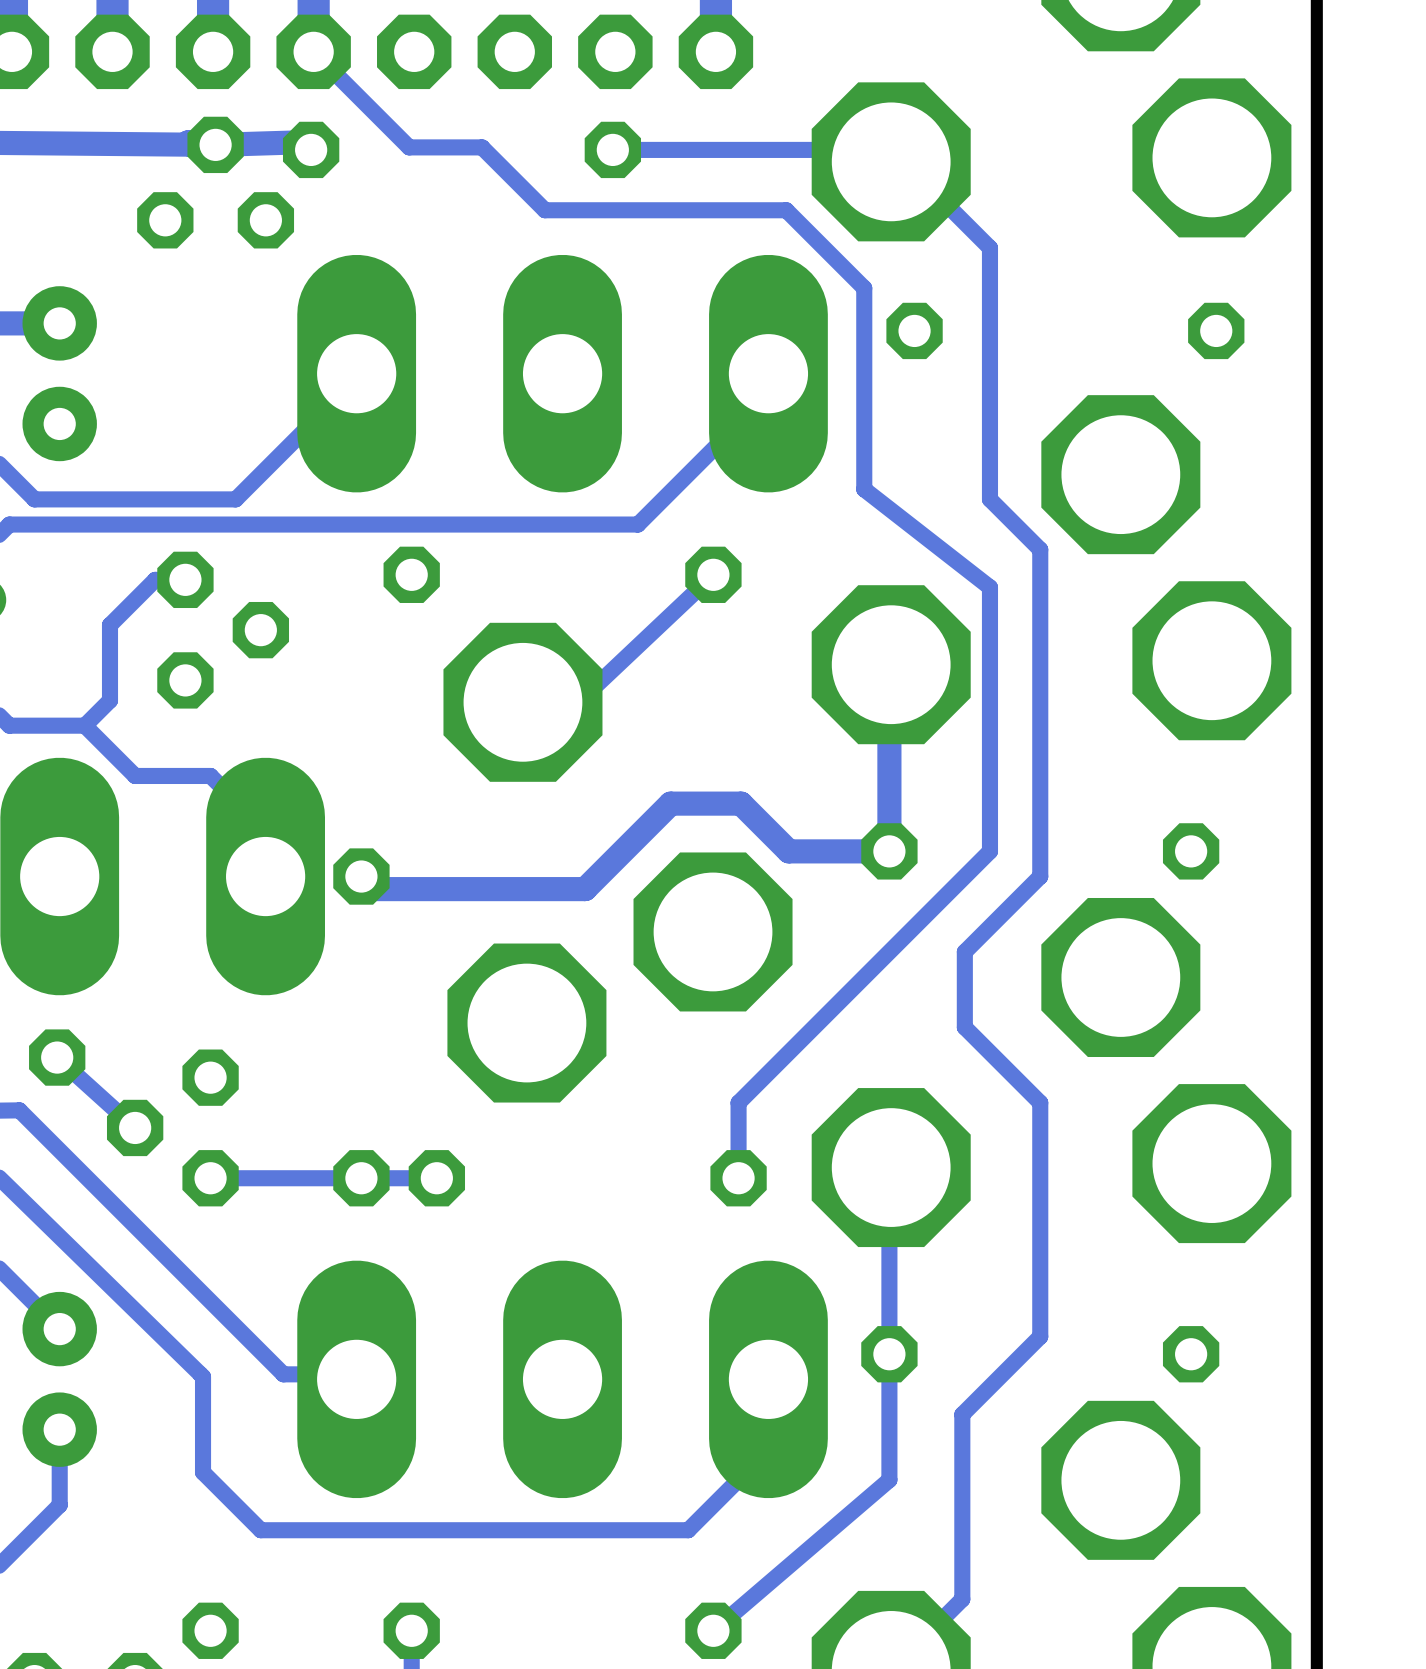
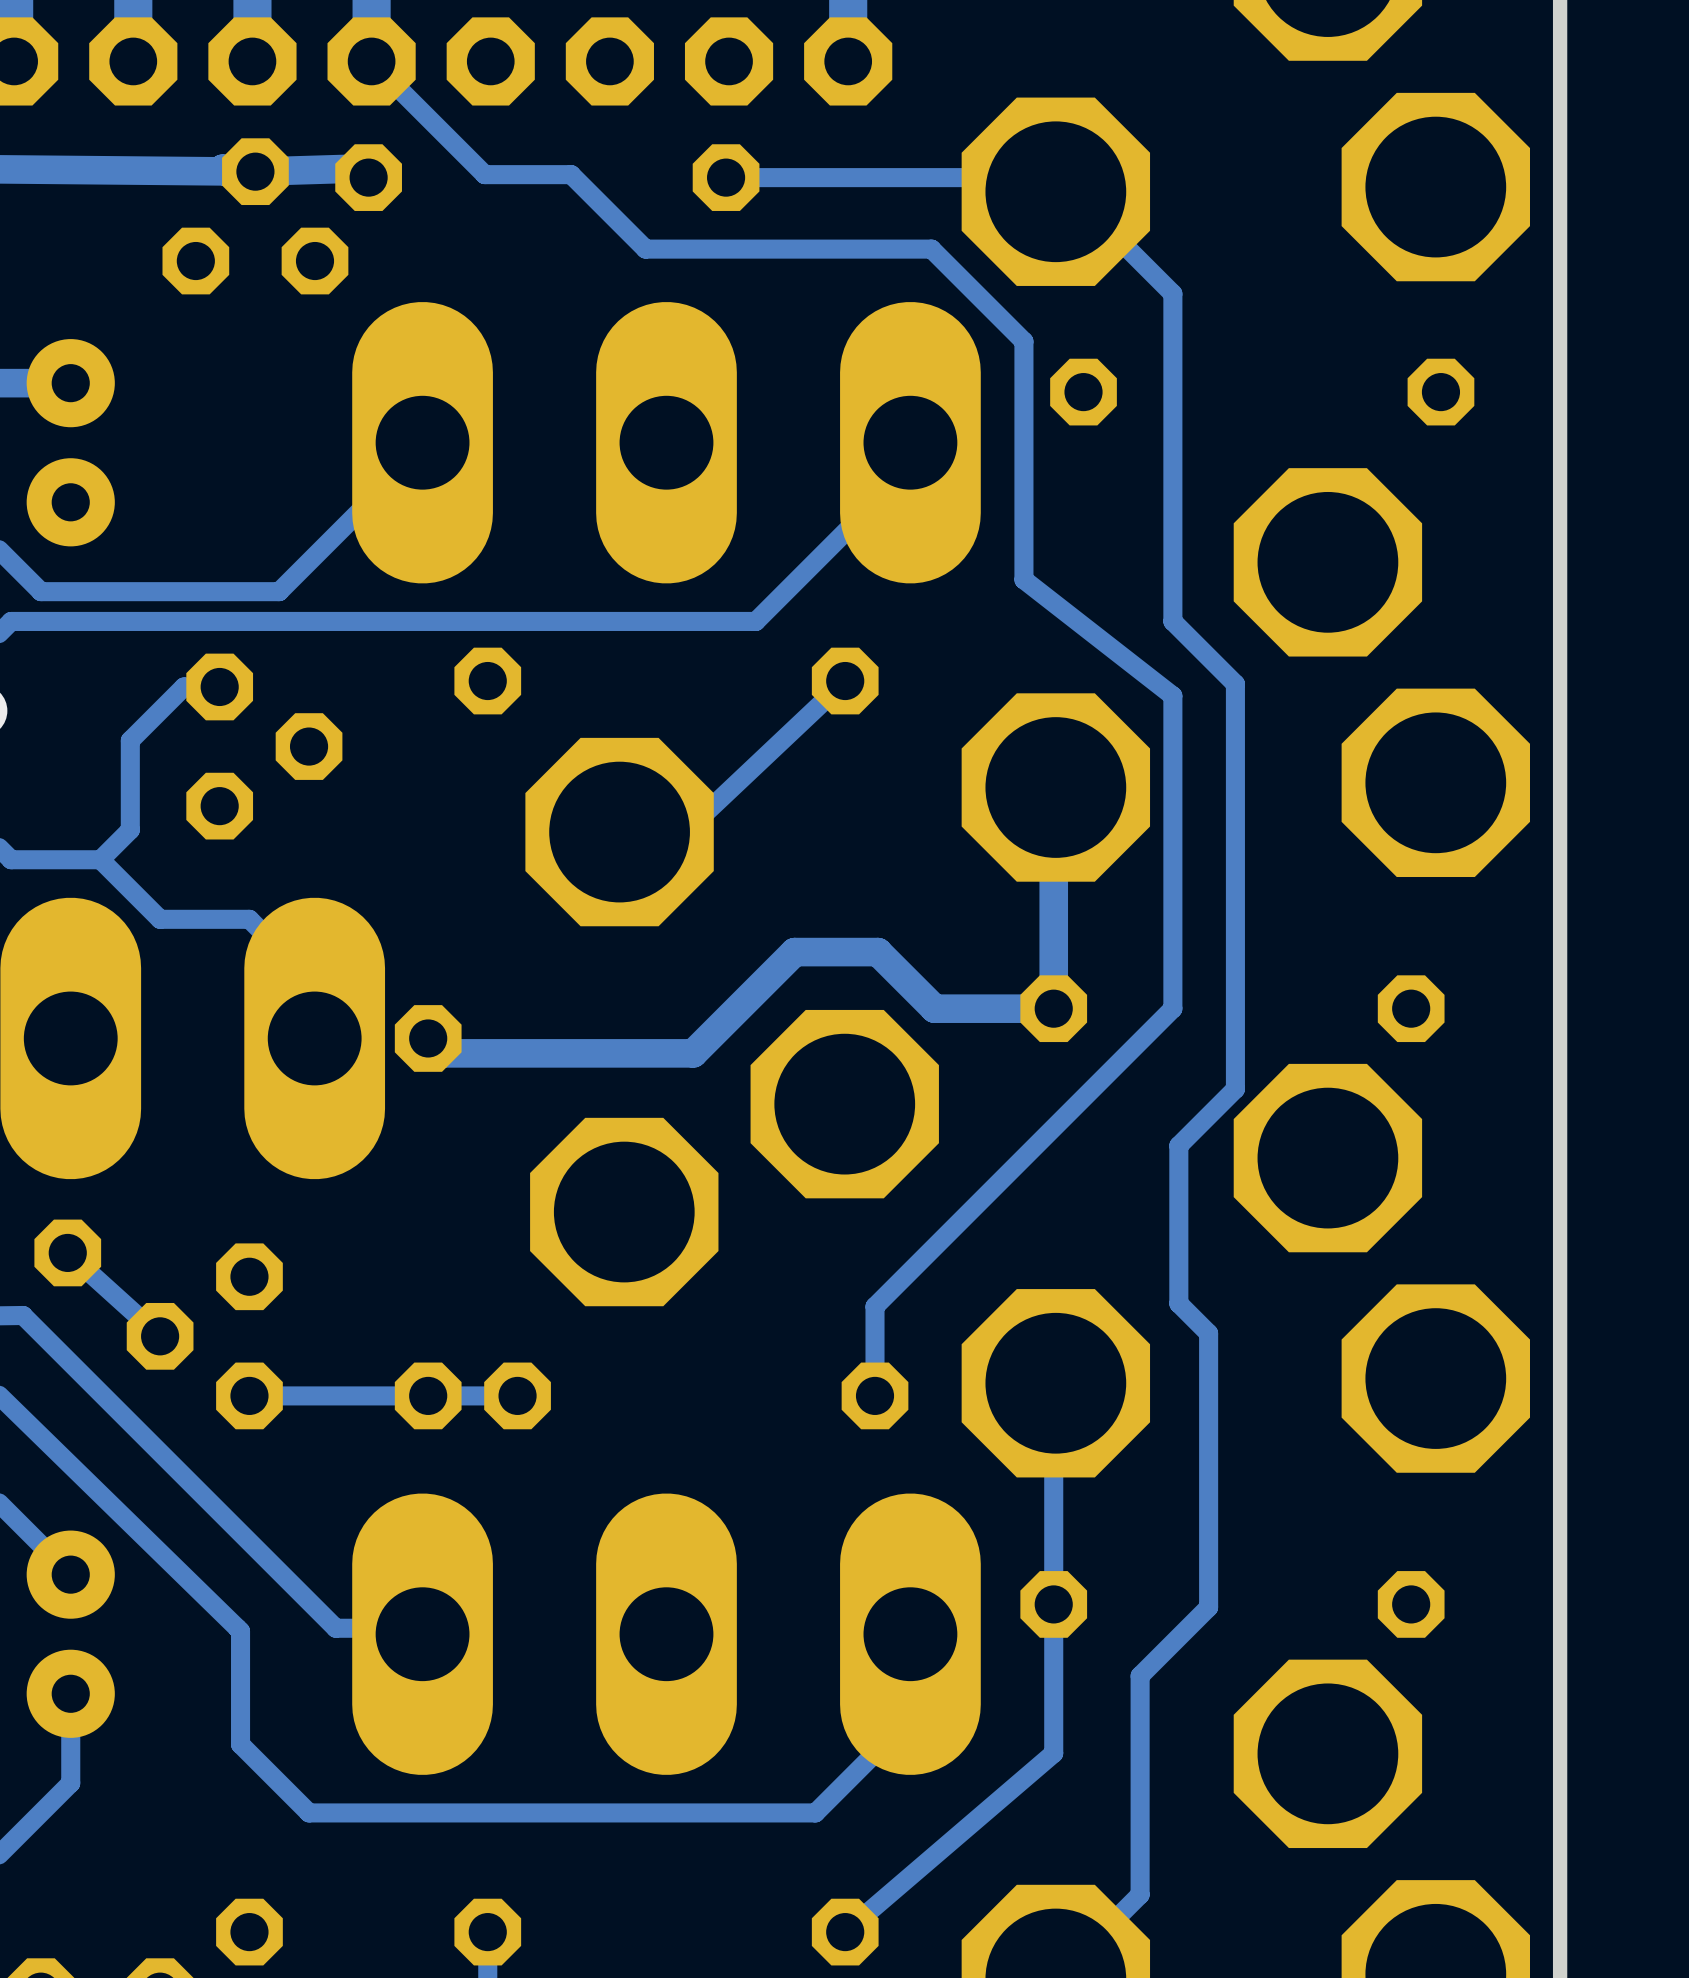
track: (989, 499) (1040, 549) (1040, 876) (964, 951) (964, 1027) (1040, 1102) (1040, 1336) (1020, 1356) -> (1172, 591) (1172, 621) (1235, 684) (1235, 1089) (1178, 1145) (1178, 1303) (1208, 1333) (1208, 1607)

